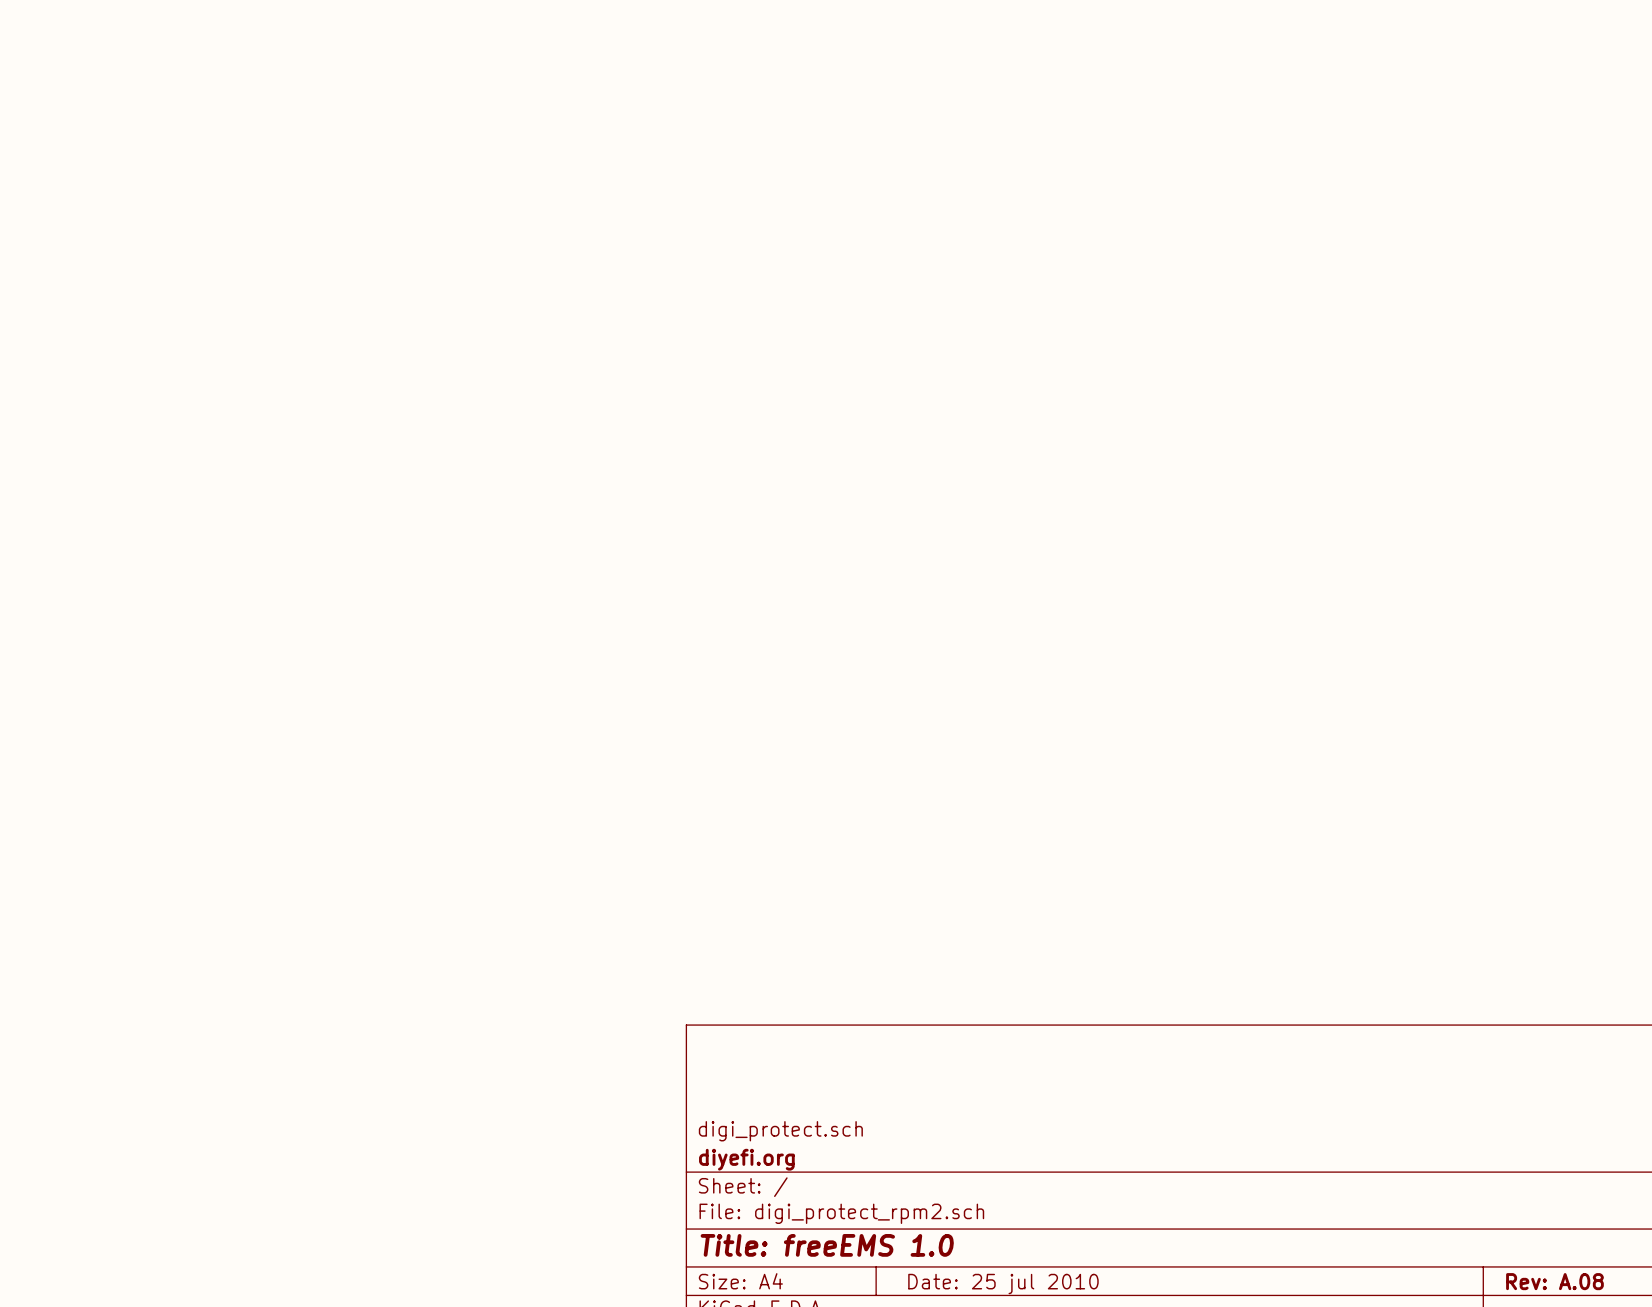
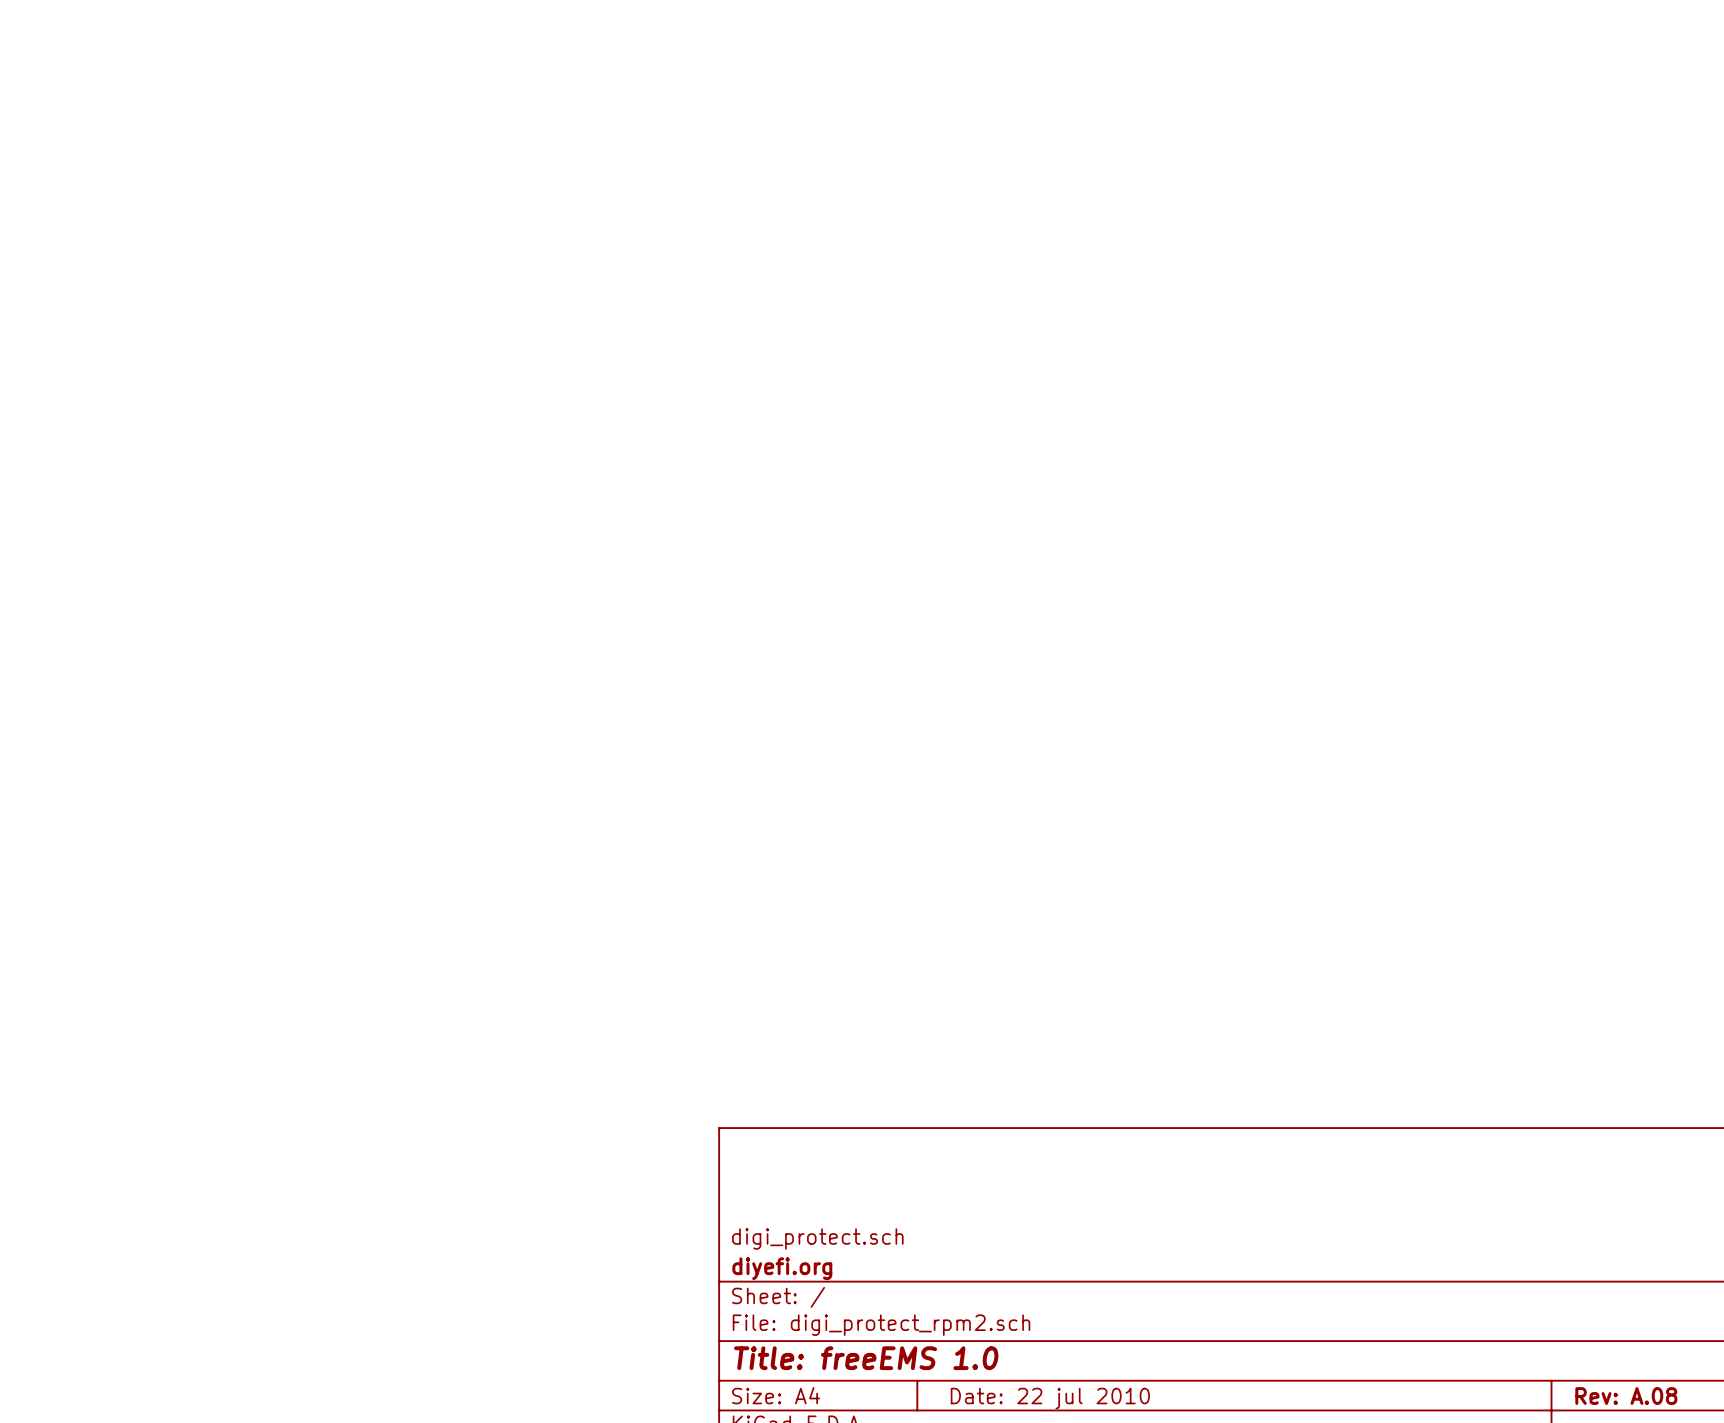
title block: Date: 25 jul 2010 (1003, 1283) -> Date: 22 jul 2010 (1050, 1398)

